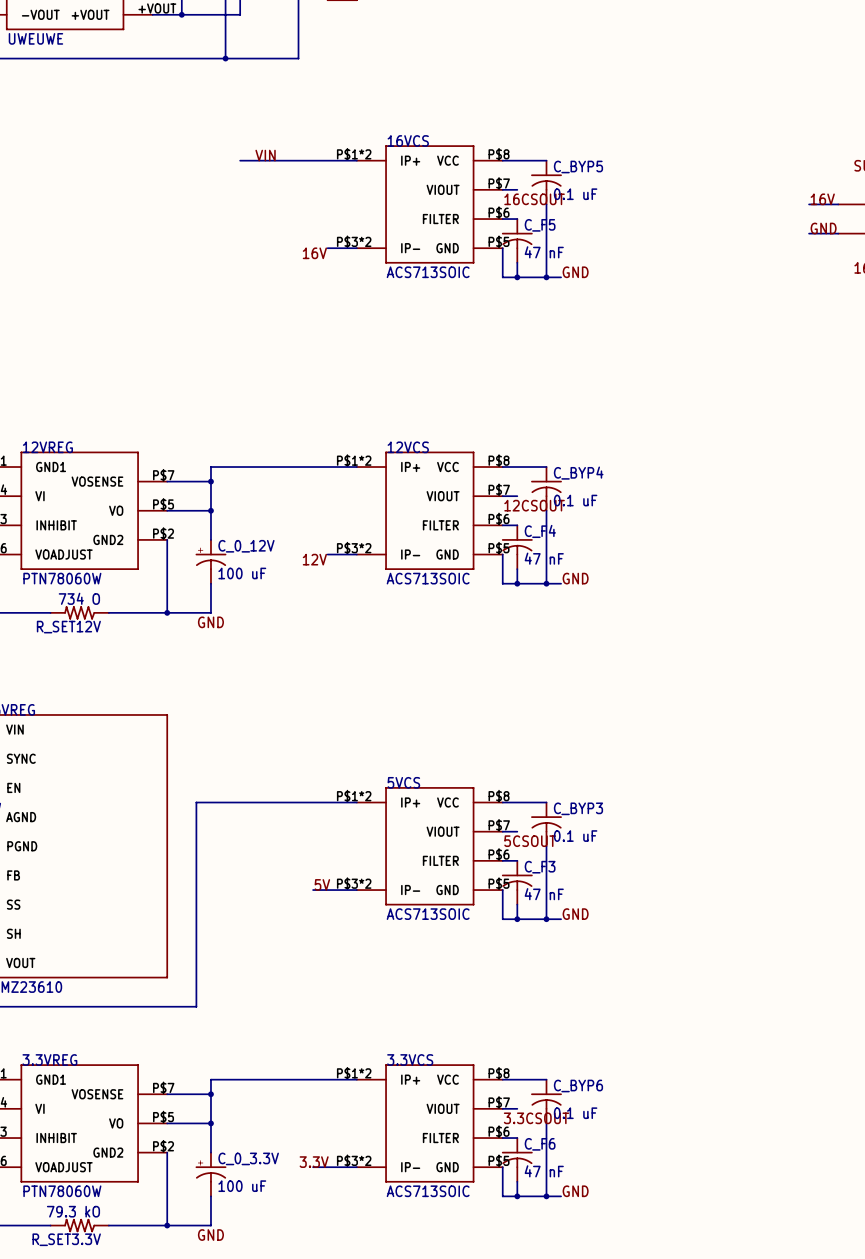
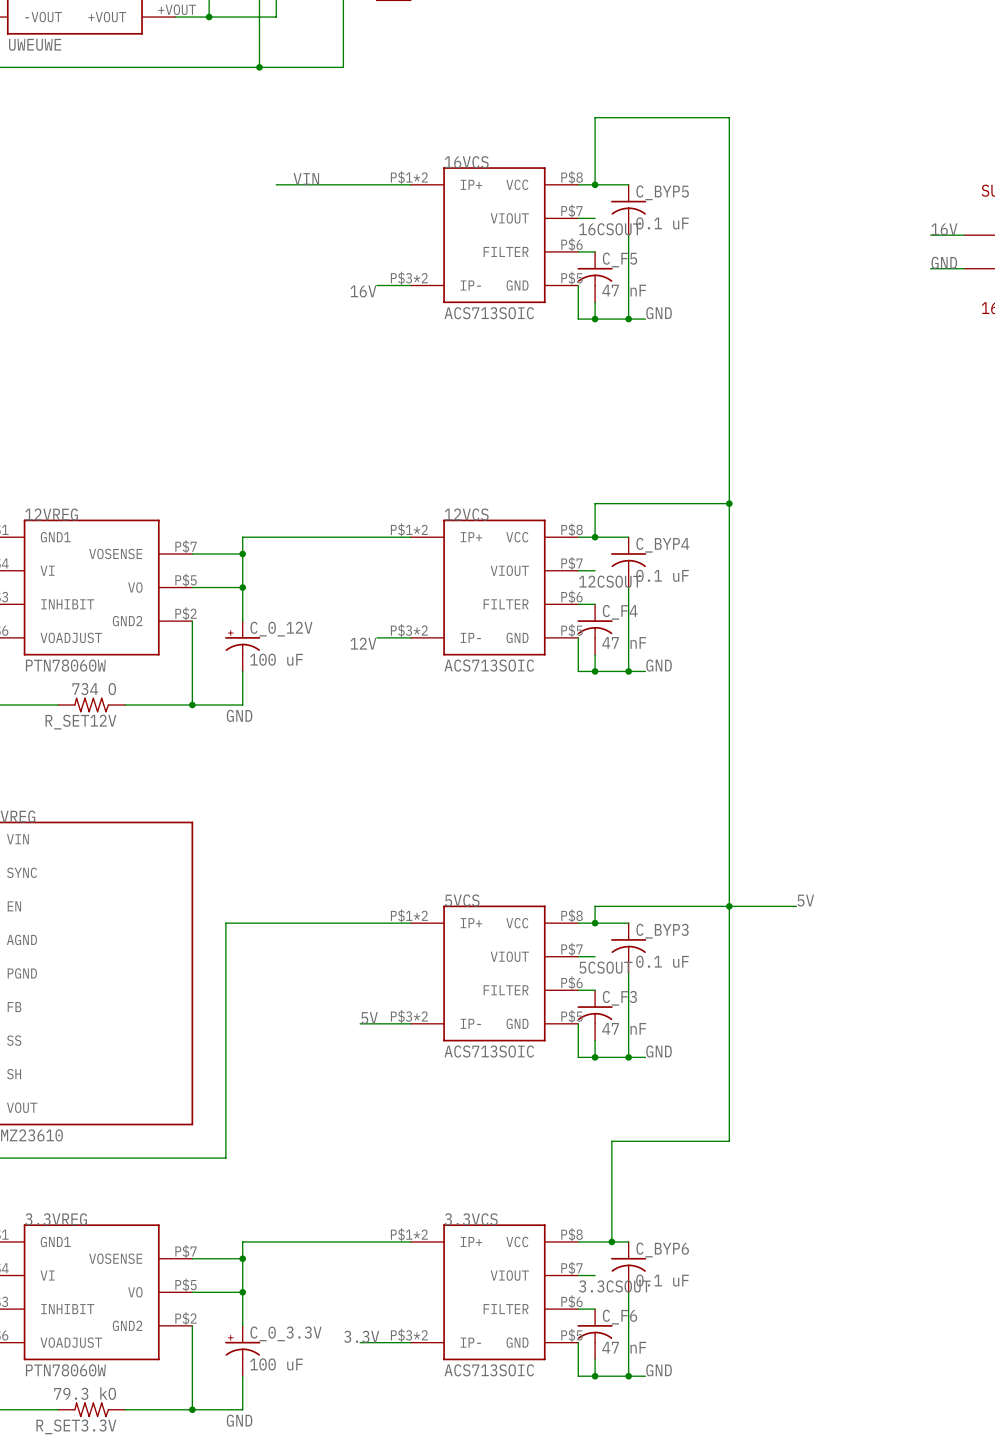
wire: none -> (595, 184) (595, 117) (729, 117) (729, 1141) (611, 1141) (611, 1241)
junction: none -> (595, 184)
wire: none -> (729, 503) (595, 503) (595, 537)
junction: none -> (729, 503)
junction: none -> (595, 537)
label: none -> 5V (805, 900)
junction: none -> (729, 906)
wire: none -> (796, 906) (595, 906) (595, 923)
junction: none -> (595, 923)
junction: none -> (611, 1241)

